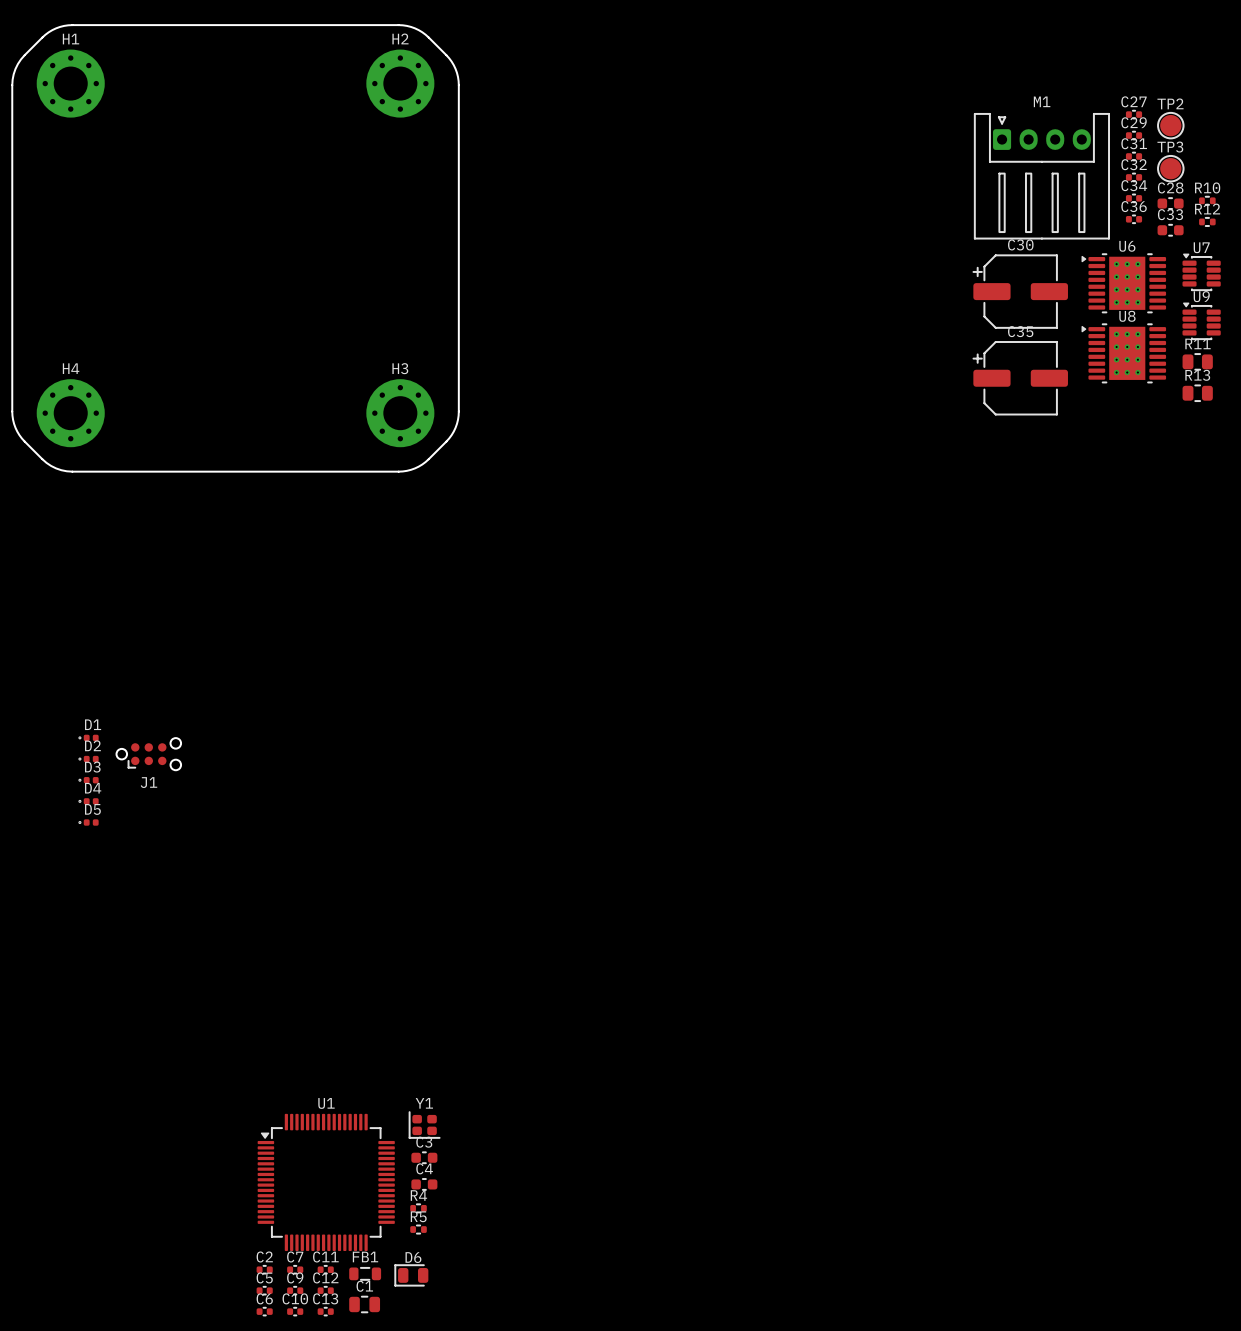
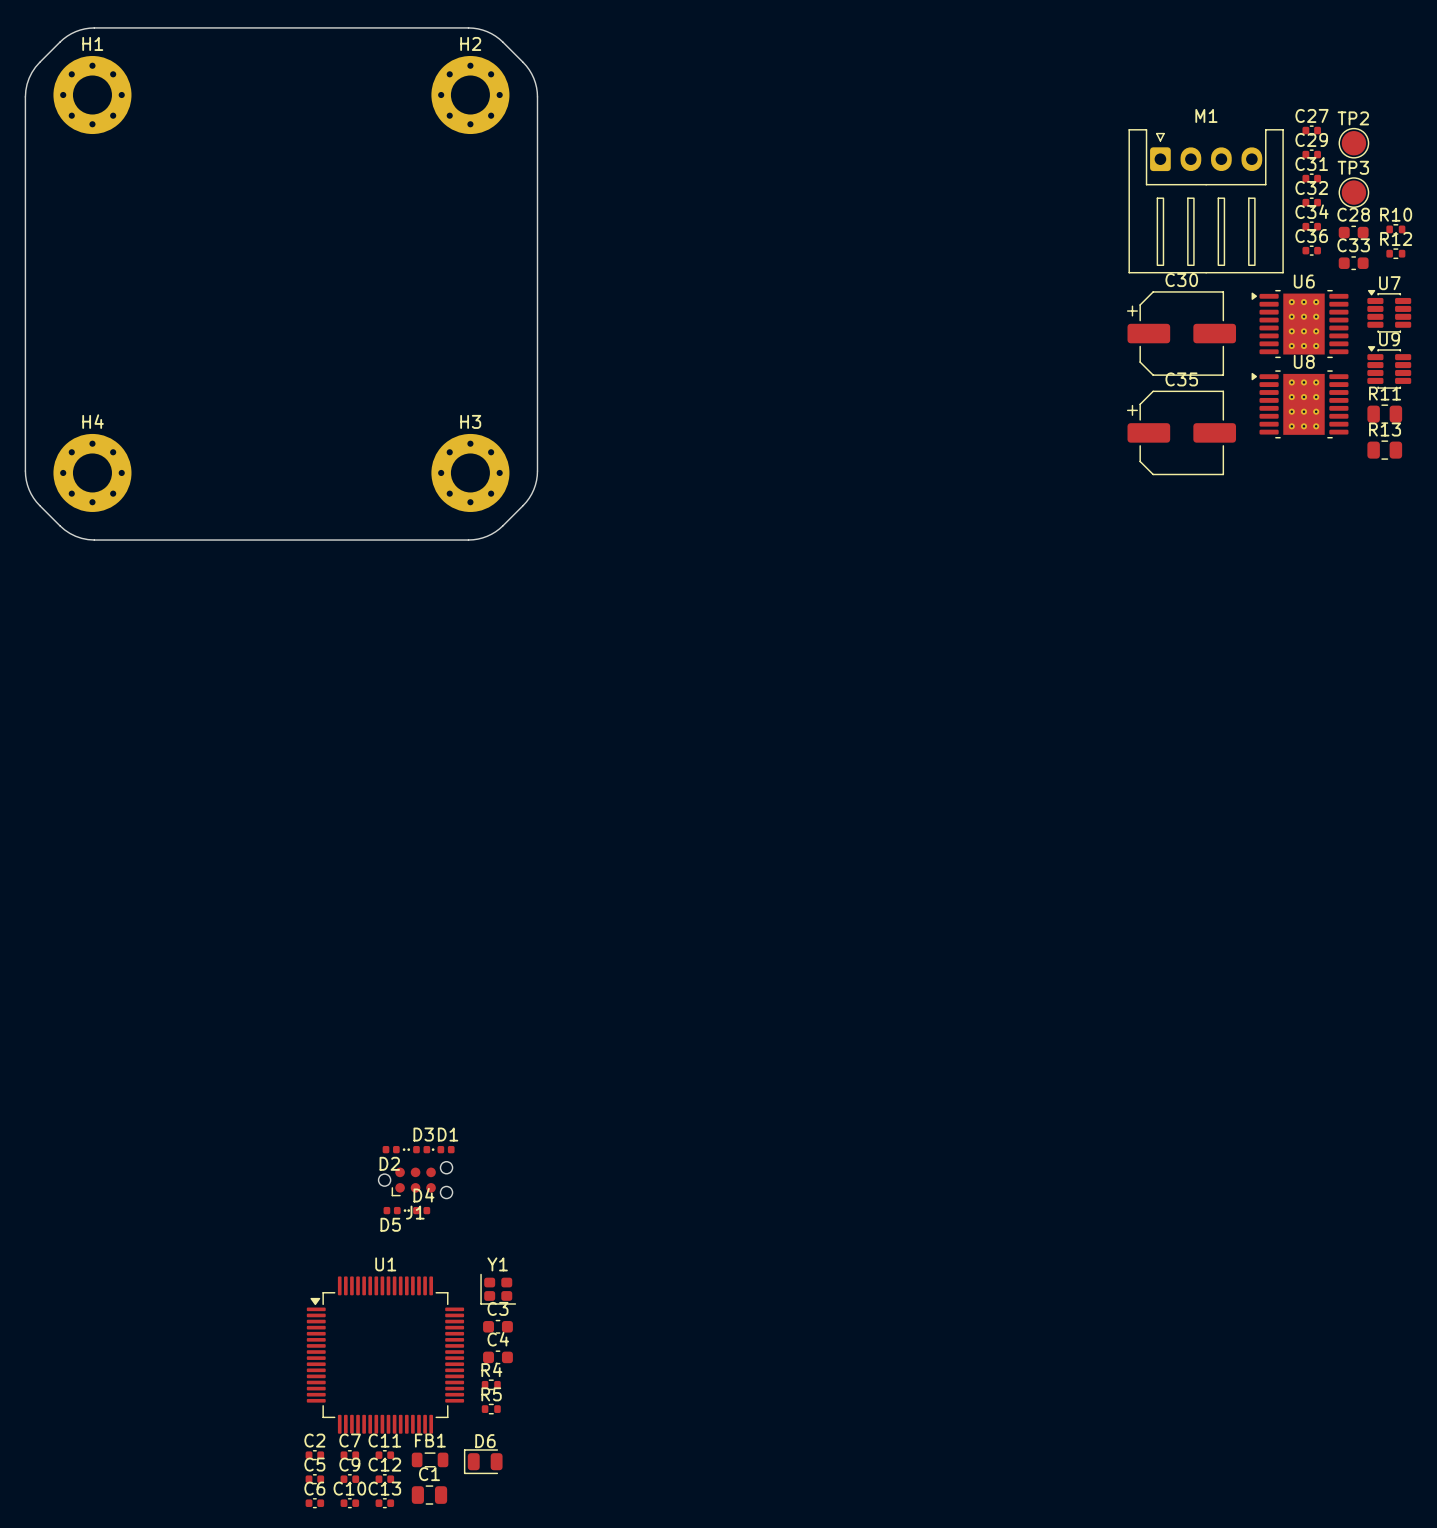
D1 position: (88, 737) -> (443, 1149)
J1 position: (148, 754) -> (415, 1180)
D2 rotation: 0° (88, 759) -> 180° (393, 1149)
D2 position: (88, 759) -> (393, 1149)
D3 position: (88, 780) -> (418, 1149)
D4 position: (88, 801) -> (418, 1210)
D5 rotation: 0° (88, 822) -> 180° (394, 1210)
D5 position: (88, 822) -> (394, 1210)

